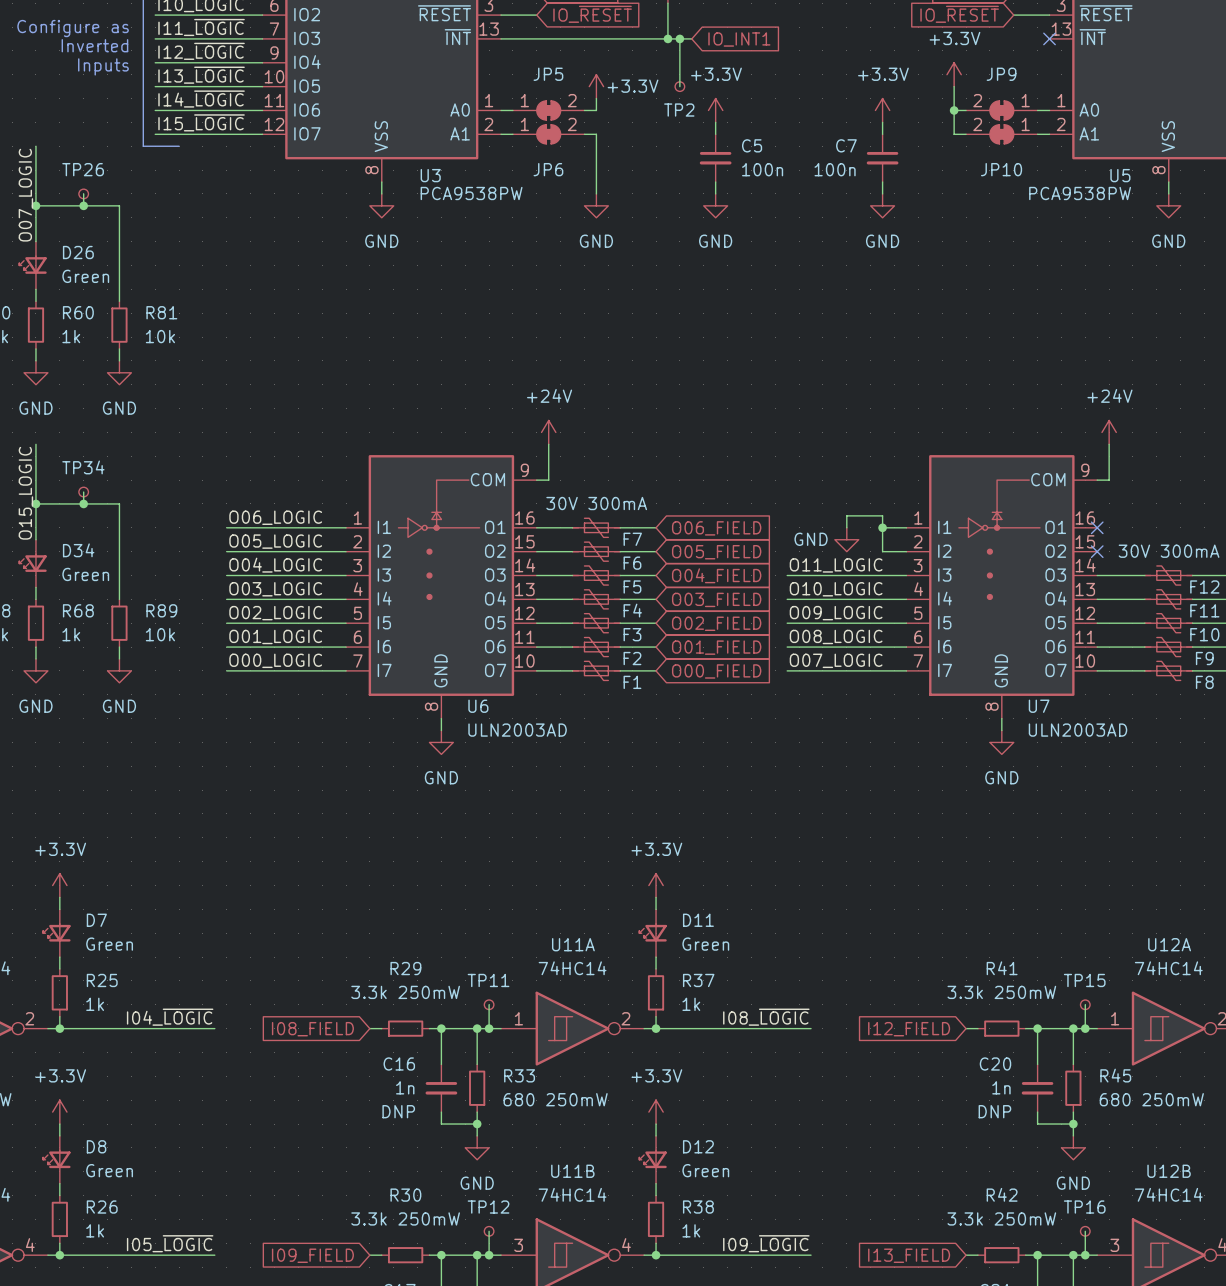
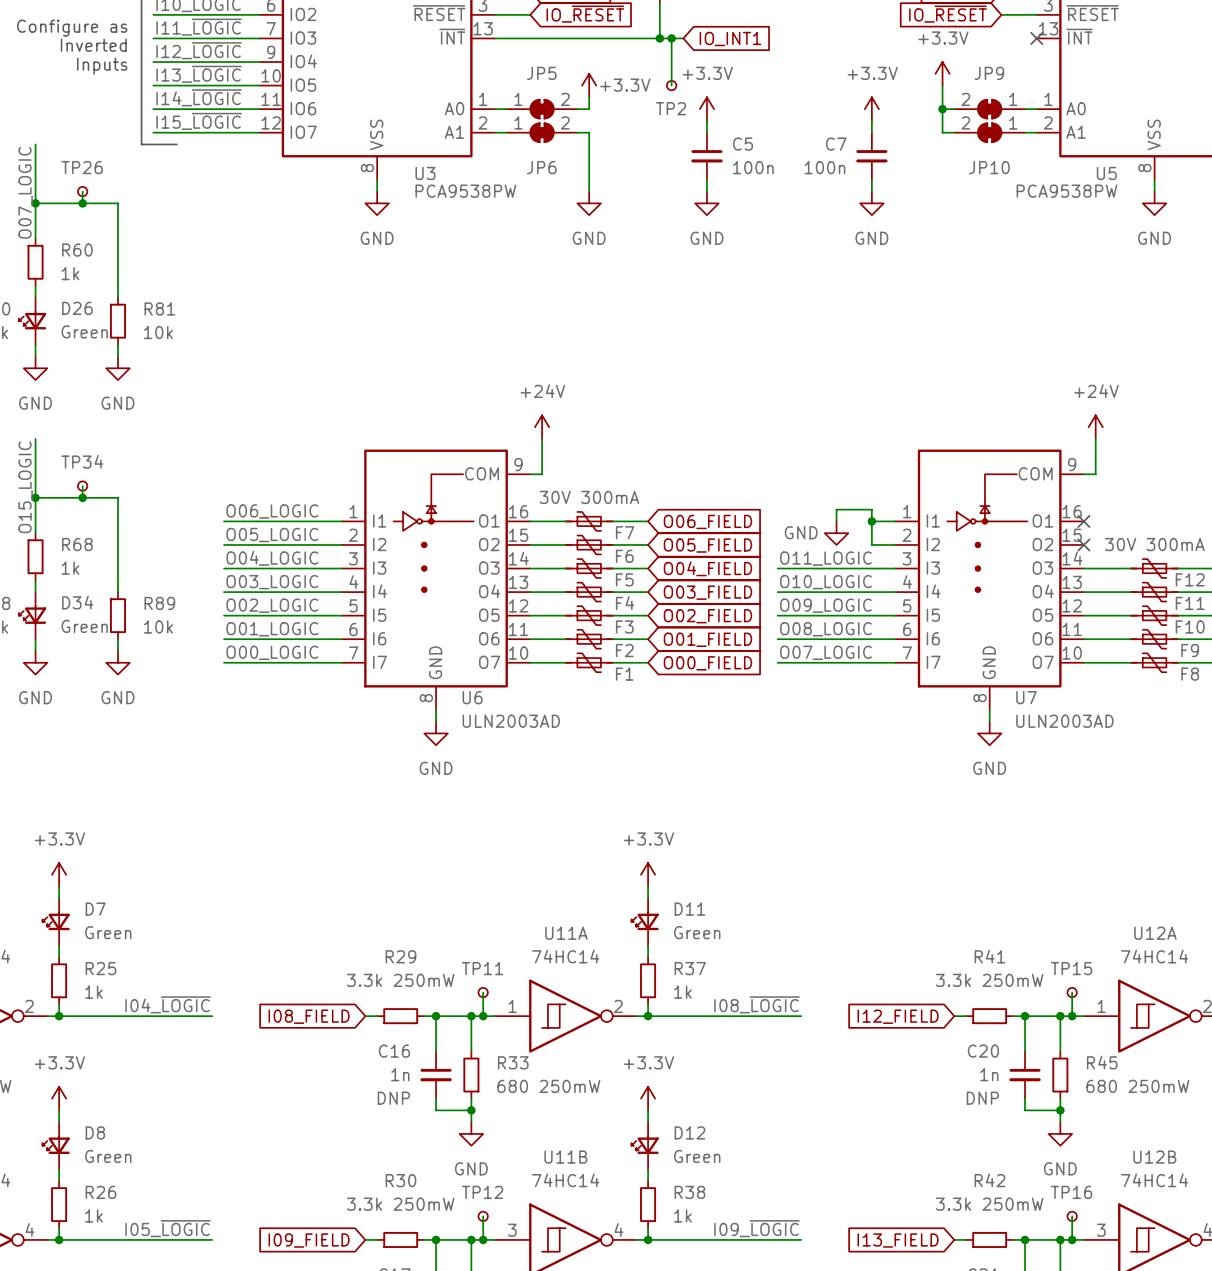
D26 position: (33, 265) -> (32, 321)
R60 position: (35, 325) -> (35, 262)
D34 position: (33, 563) -> (32, 615)
R68 position: (35, 623) -> (35, 556)

